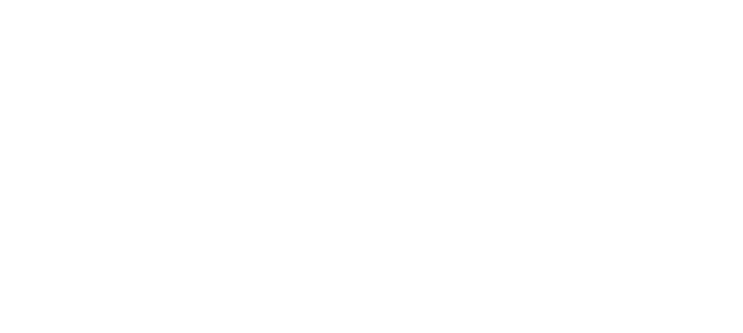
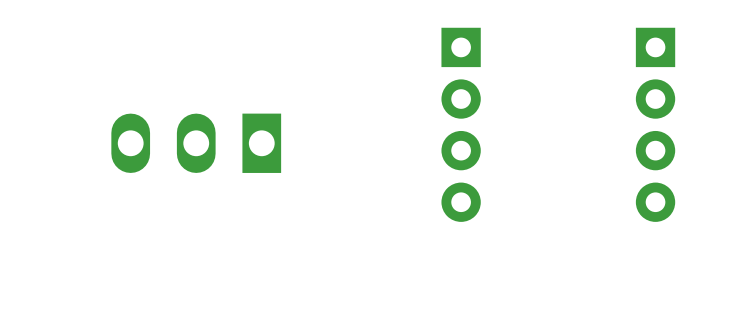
part: none -> (461, 124)
part: none -> (655, 124)
part: none -> (196, 143)

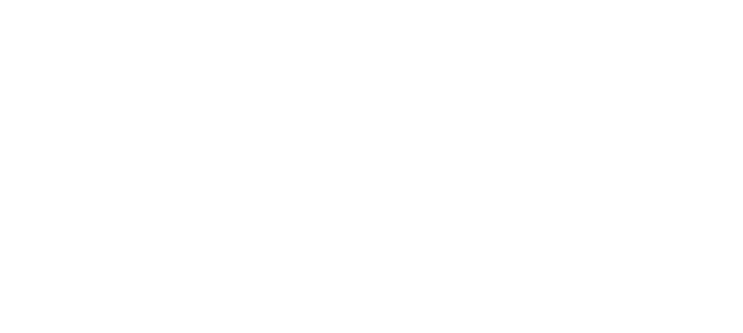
part: (461, 124) -> none
part: (655, 124) -> none
part: (196, 143) -> none

